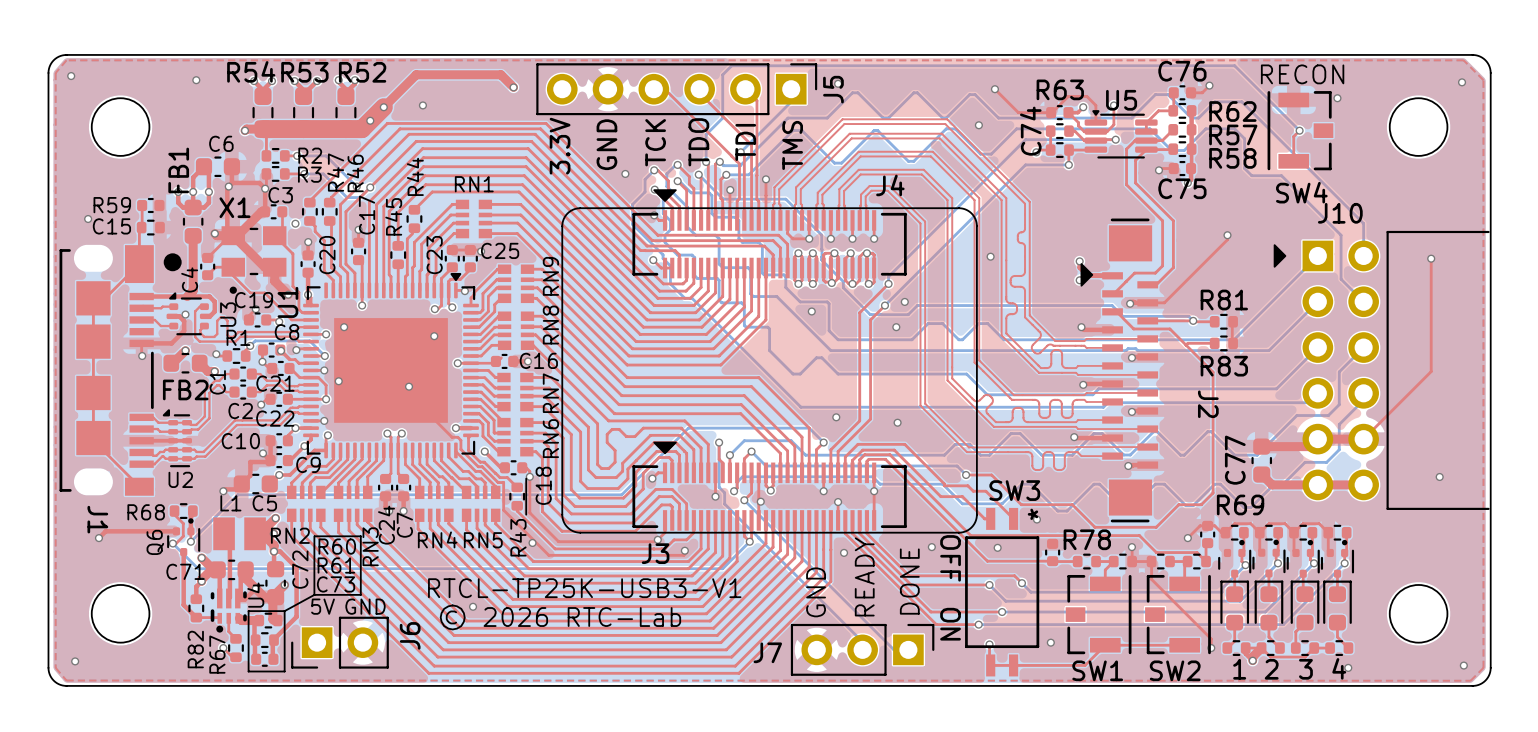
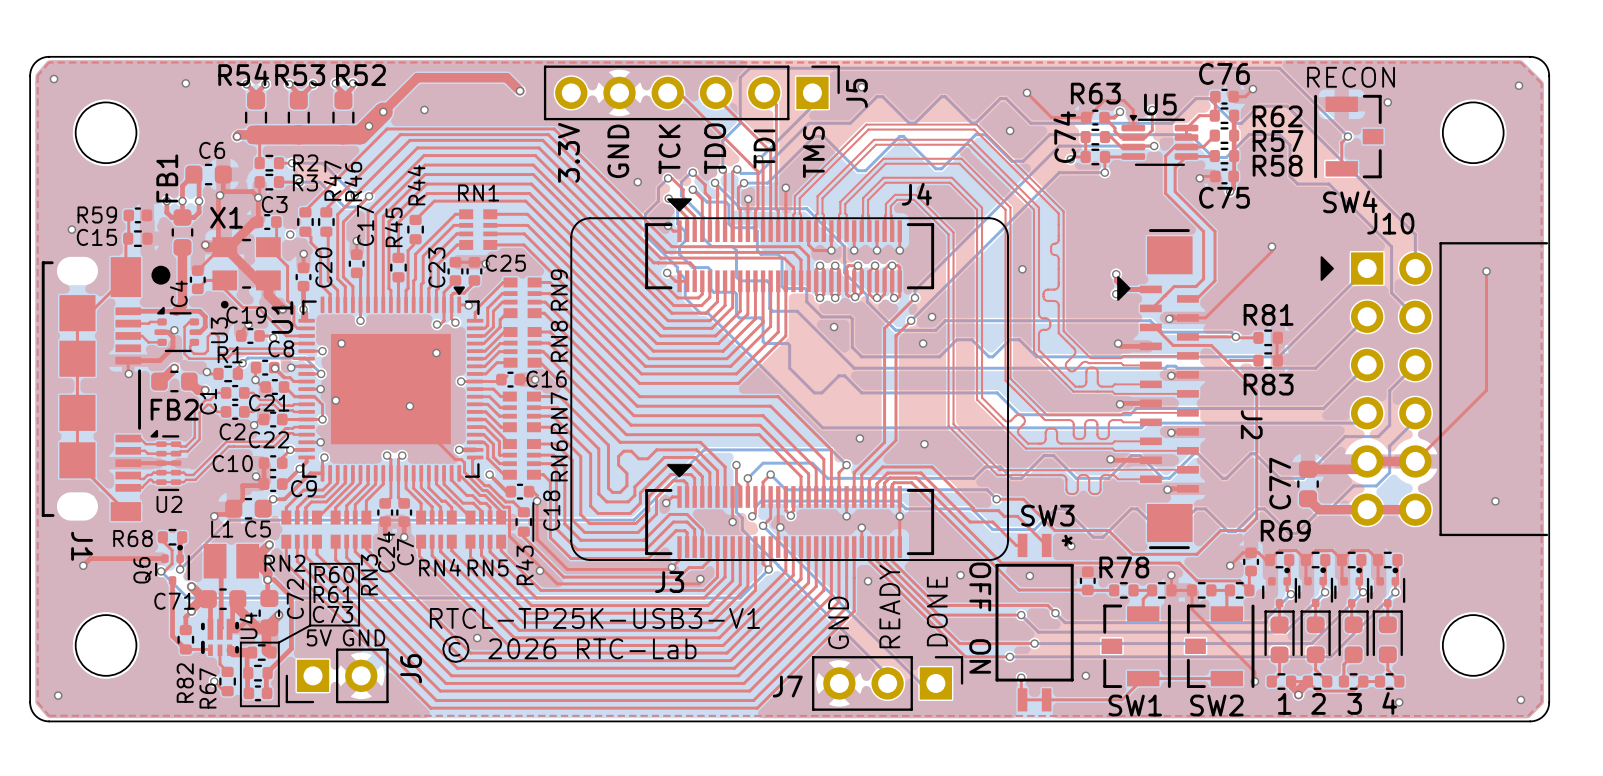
U4 footprint: [210, 588, 247, 633] -> [201, 618, 239, 656]

